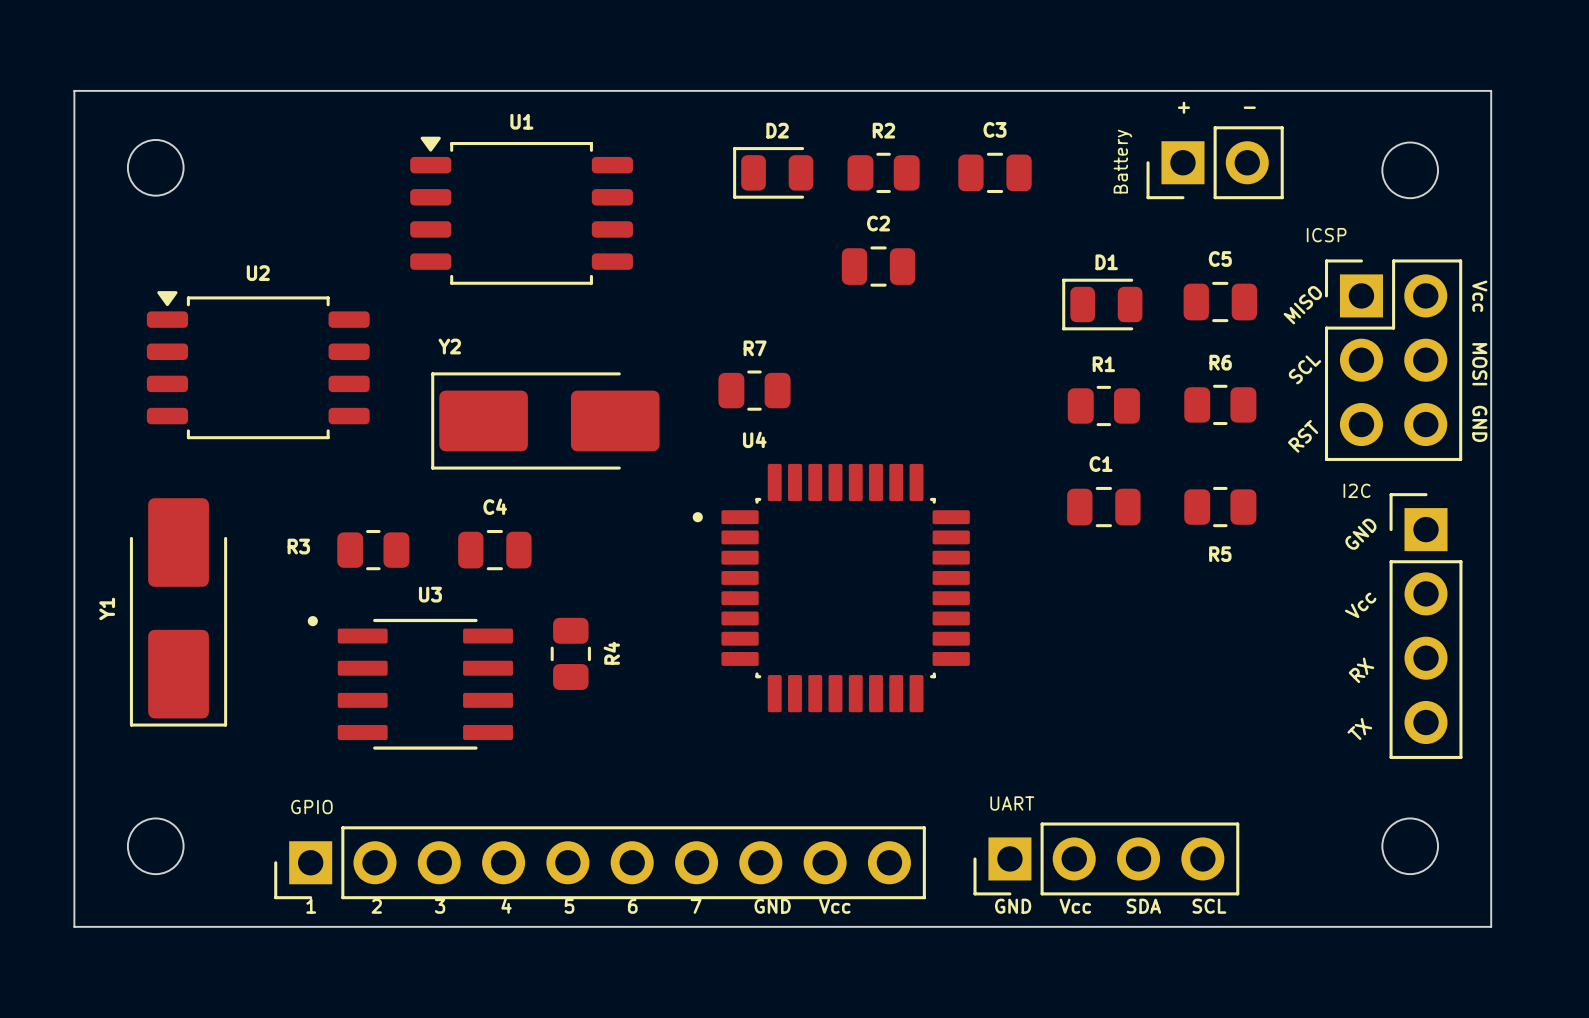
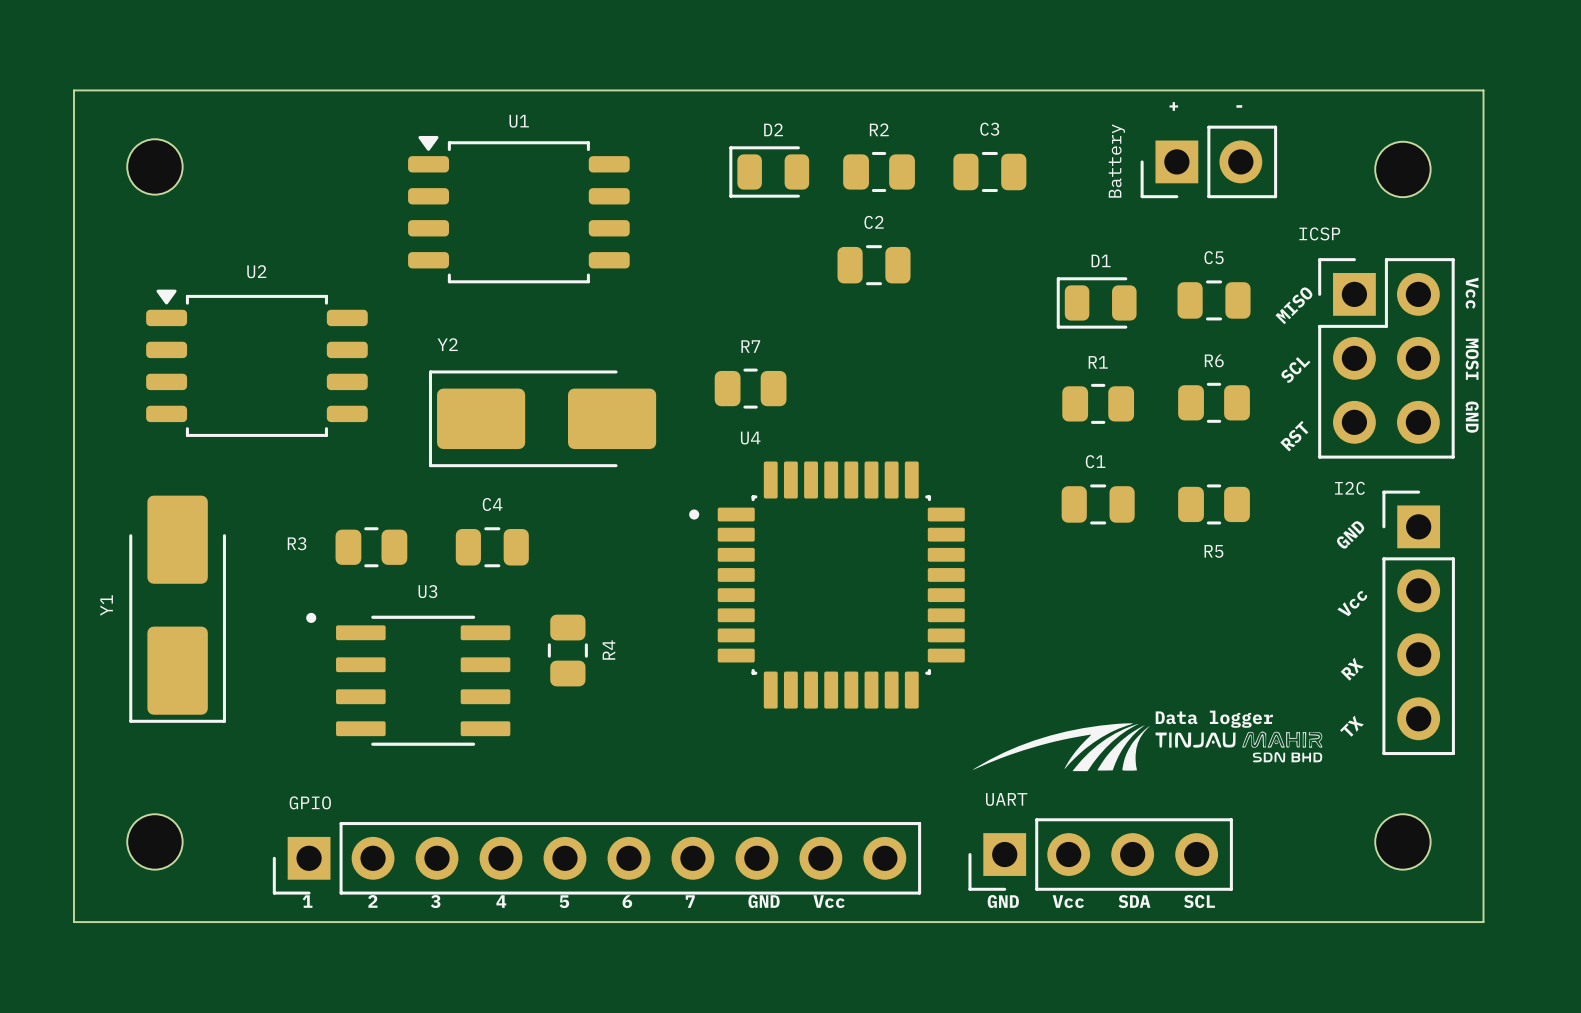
text: none -> Data logger (1214, 719)
drawing: none -> [972, 723, 1323, 772]

